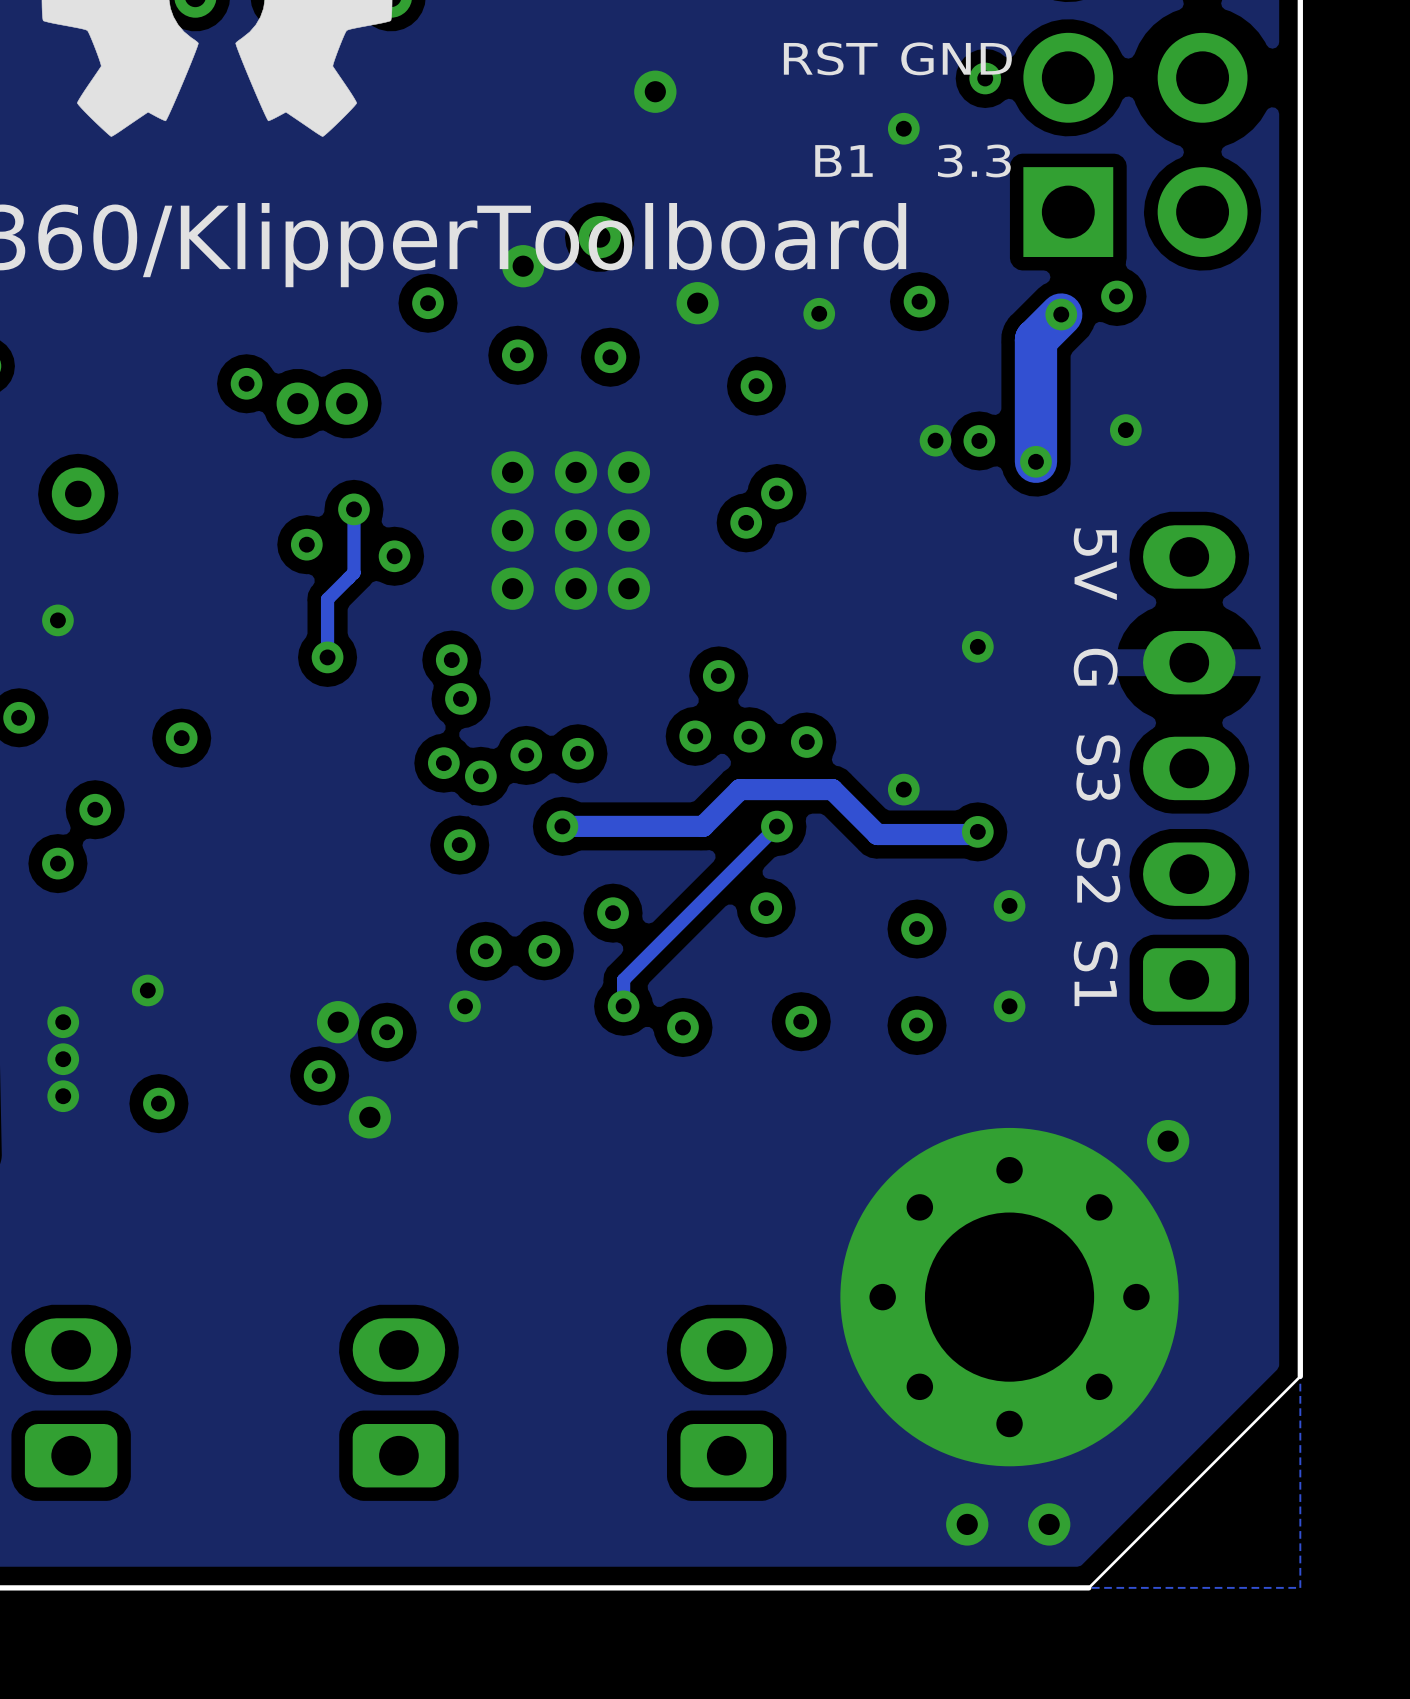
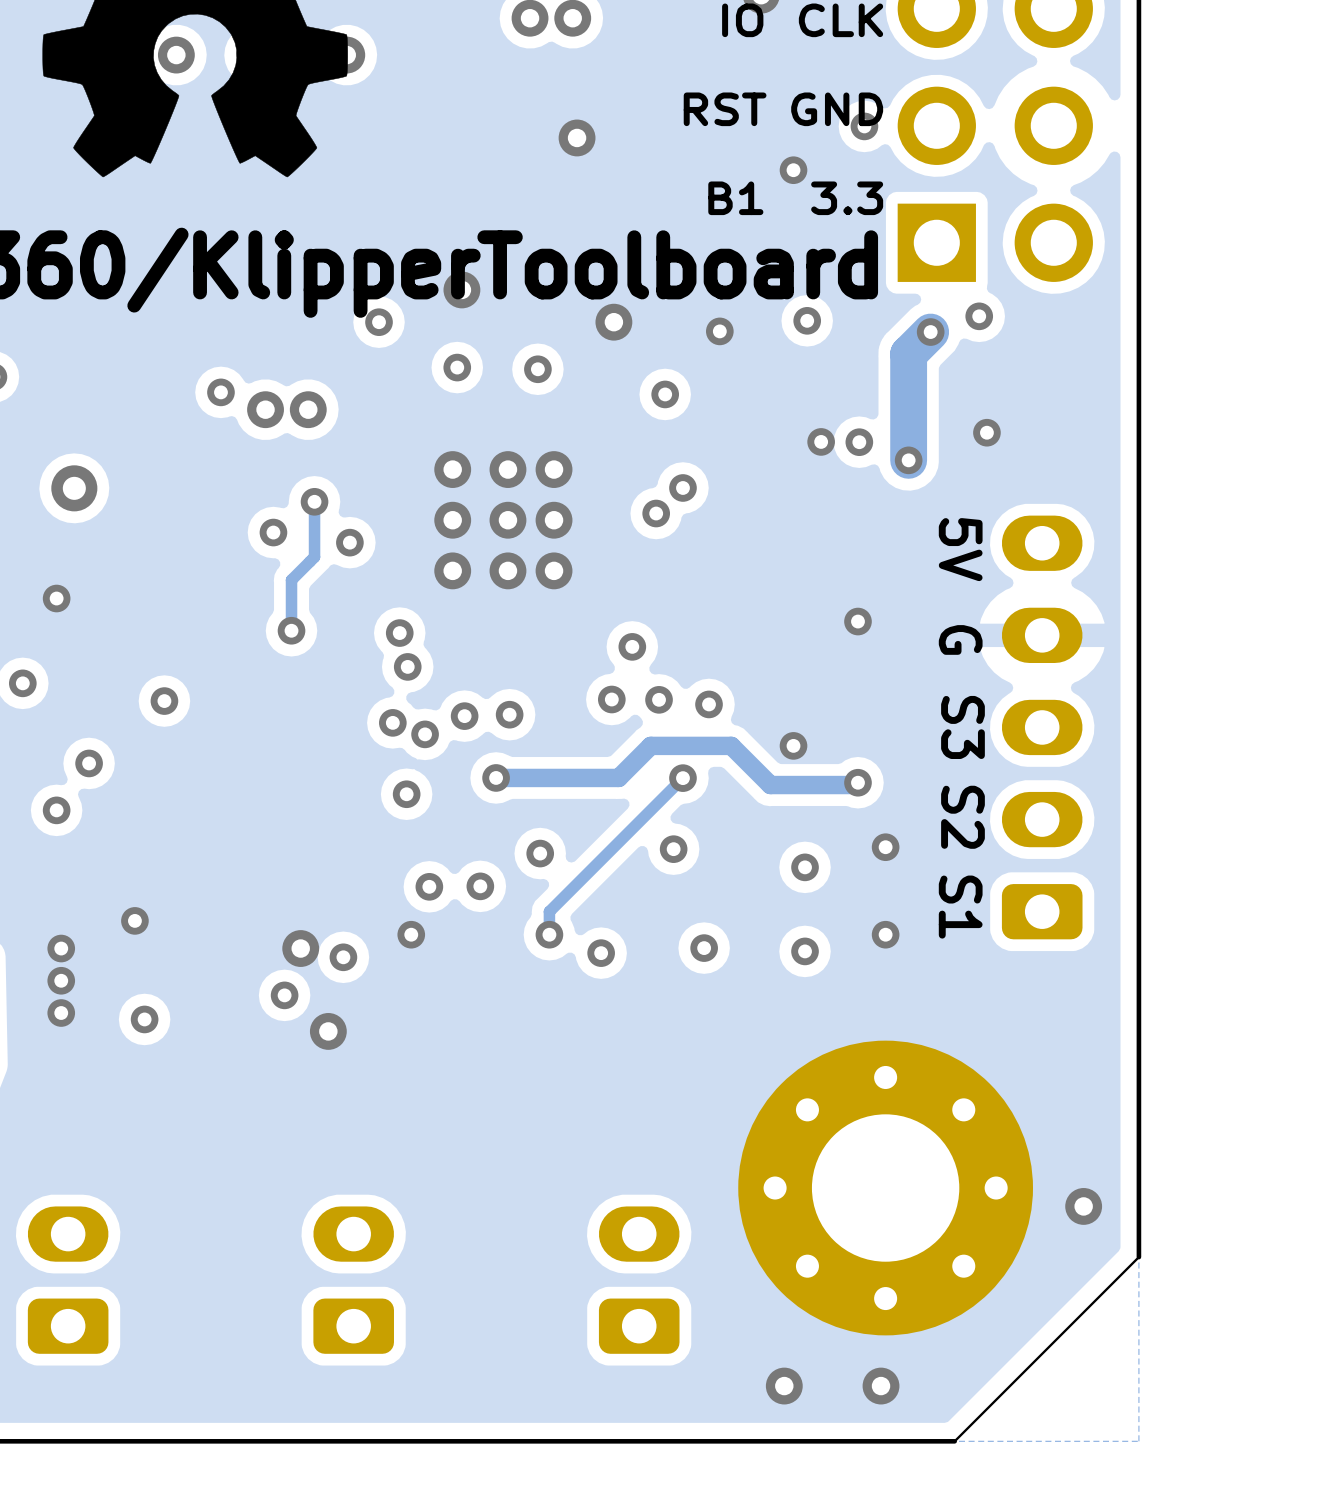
via: (599, 237) -> none
via: (1168, 1141) -> none
via: none -> (1083, 1206)
via: none -> (784, 1386)
via position: (967, 1524) -> (881, 1386)
via: (1049, 1524) -> none

